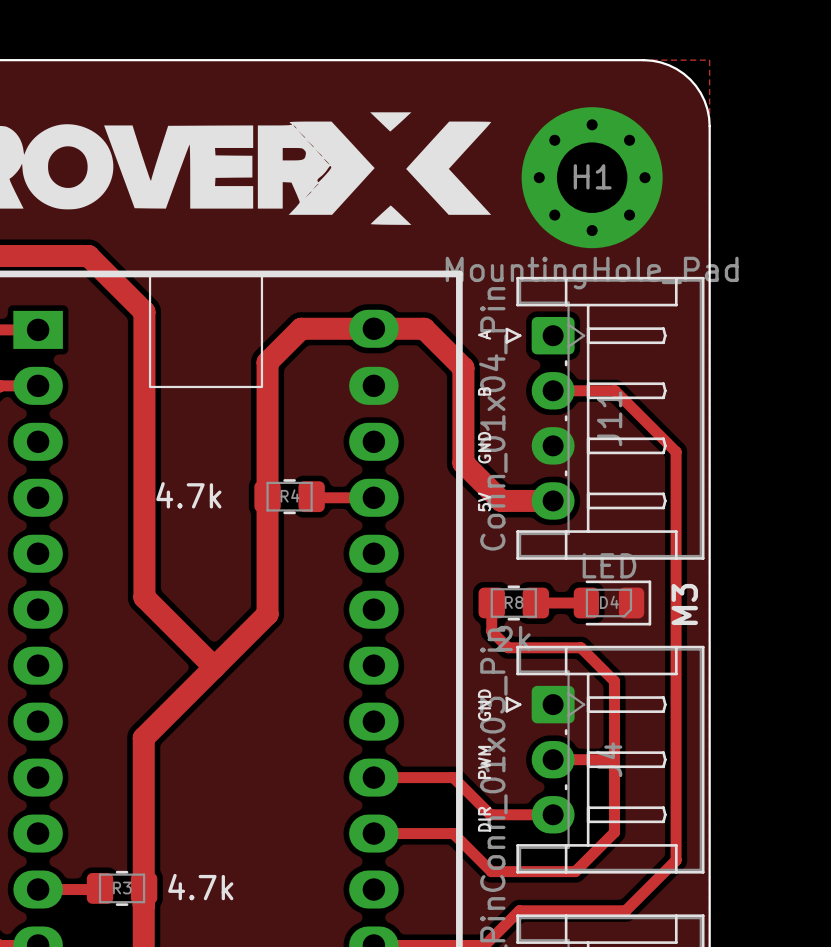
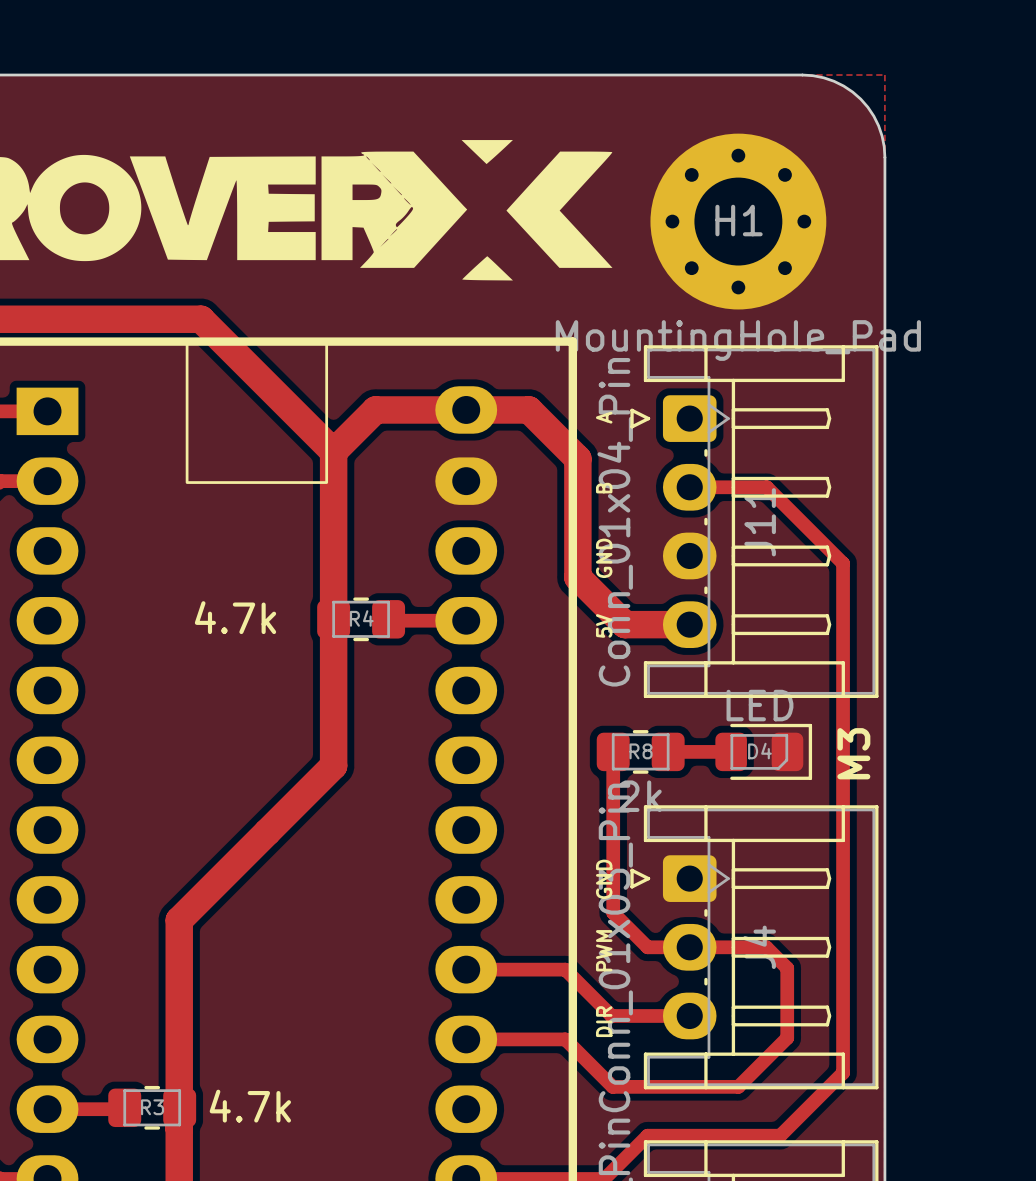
track: (88, 256) (144, 311) (144, 597) (214, 667) -> (110, 319) (201, 319) (333, 451)
track: (491, 631) (508, 647) (580, 647) (614, 681) (614, 832) (575, 871) -> (613, 787) (613, 912) (647, 947) (689, 947)
track: none -> (766, 947) (787, 968) (787, 1038) (738, 1086) (717, 1086)

